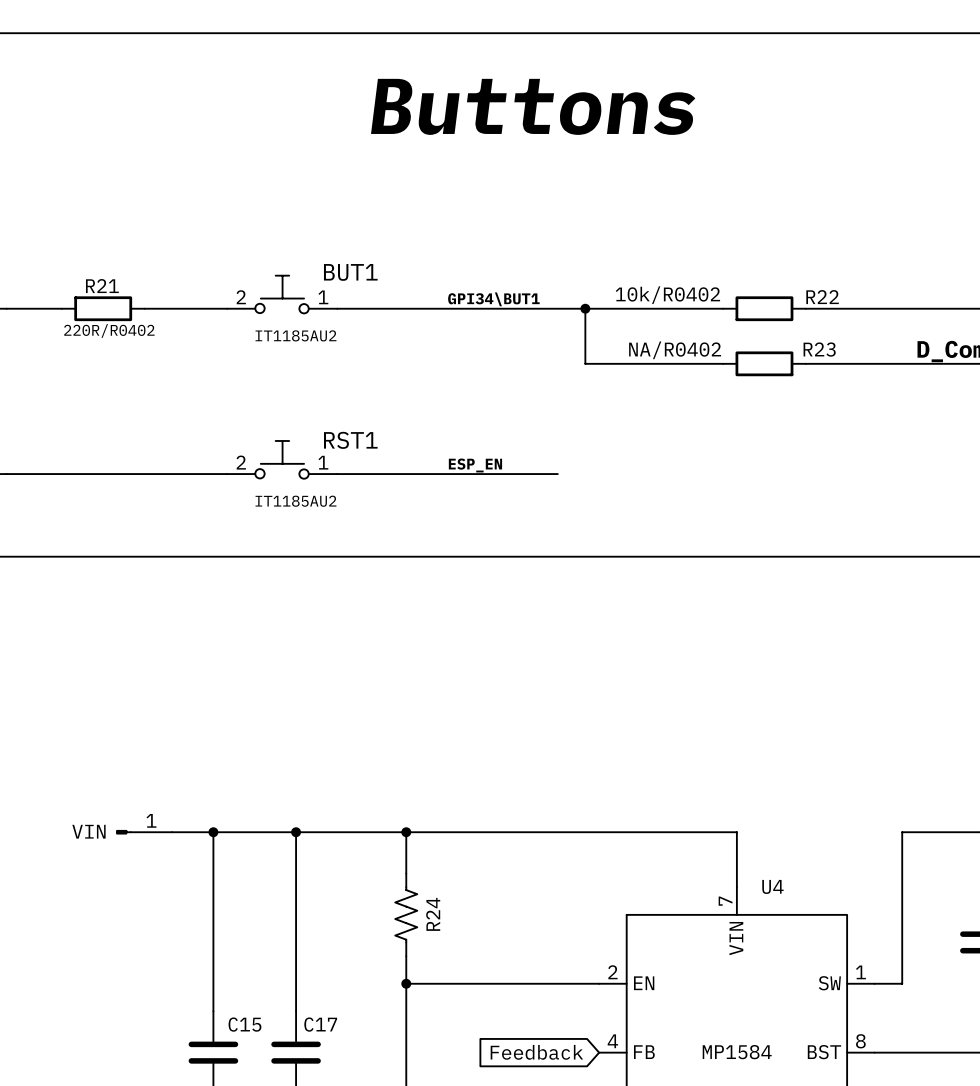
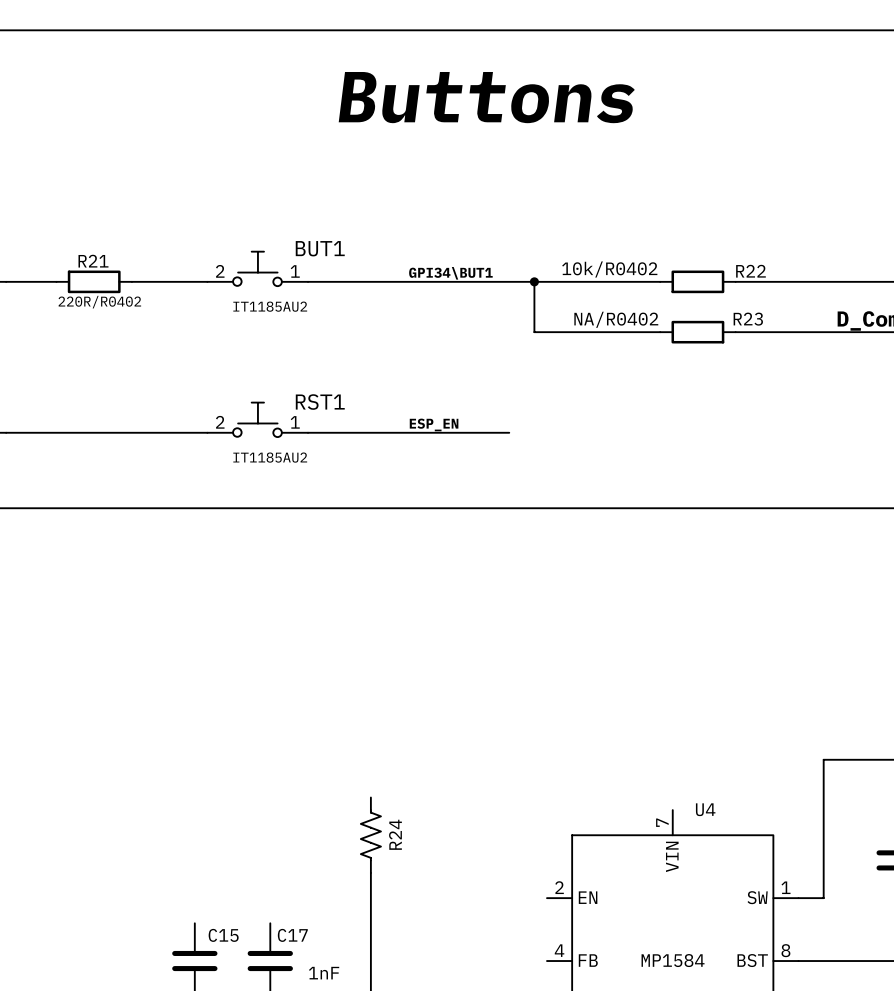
part: VIN (144, 832) -> none
wire: (172, 832) (736, 832) (736, 887) -> none
wire: (213, 832) (213, 1011) -> none
junction: (213, 832) -> none
wire: (296, 832) (296, 1011) -> none
junction: (296, 832) -> none
wire: (406, 832) (406, 873) -> none
junction: (406, 832) -> none
wire: (406, 983) (599, 983) -> none
junction: (406, 983) -> none
global label: Feedback (536, 1052) -> none
C17 value: none -> 1nF (324, 973)

